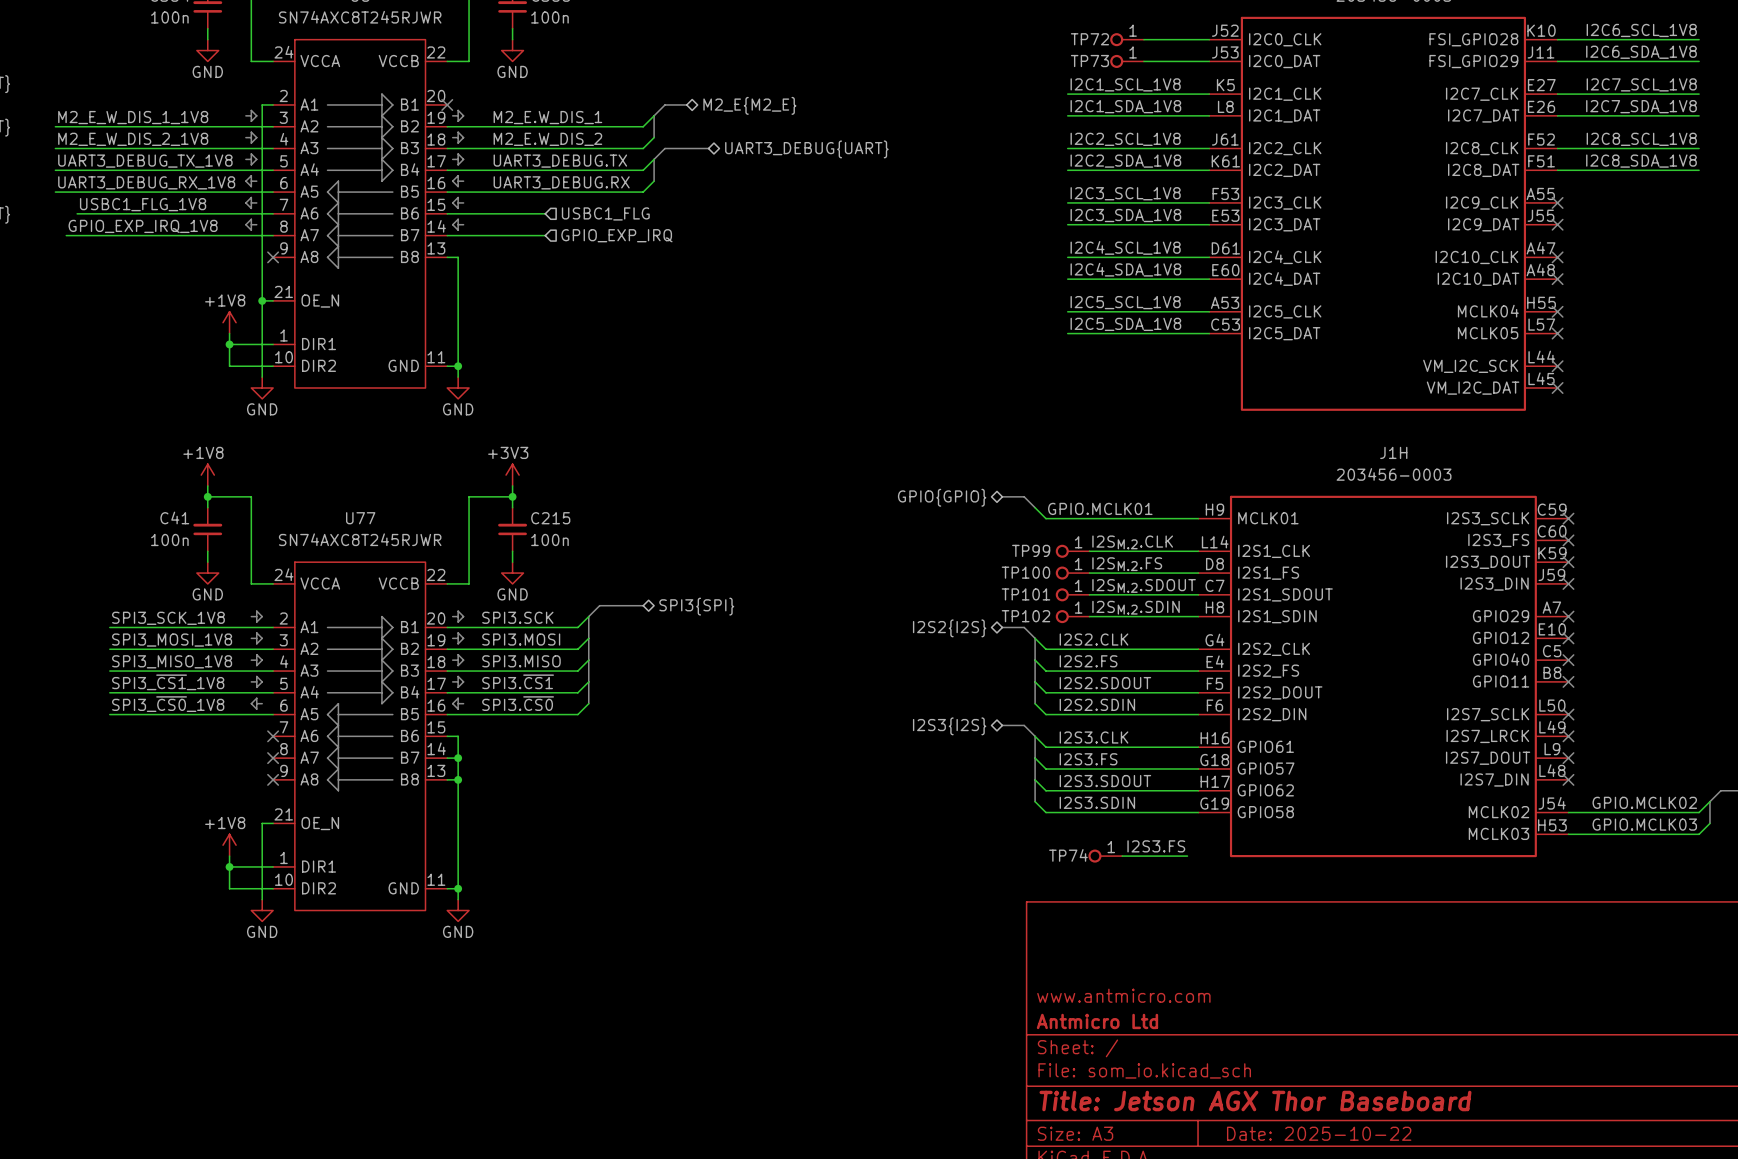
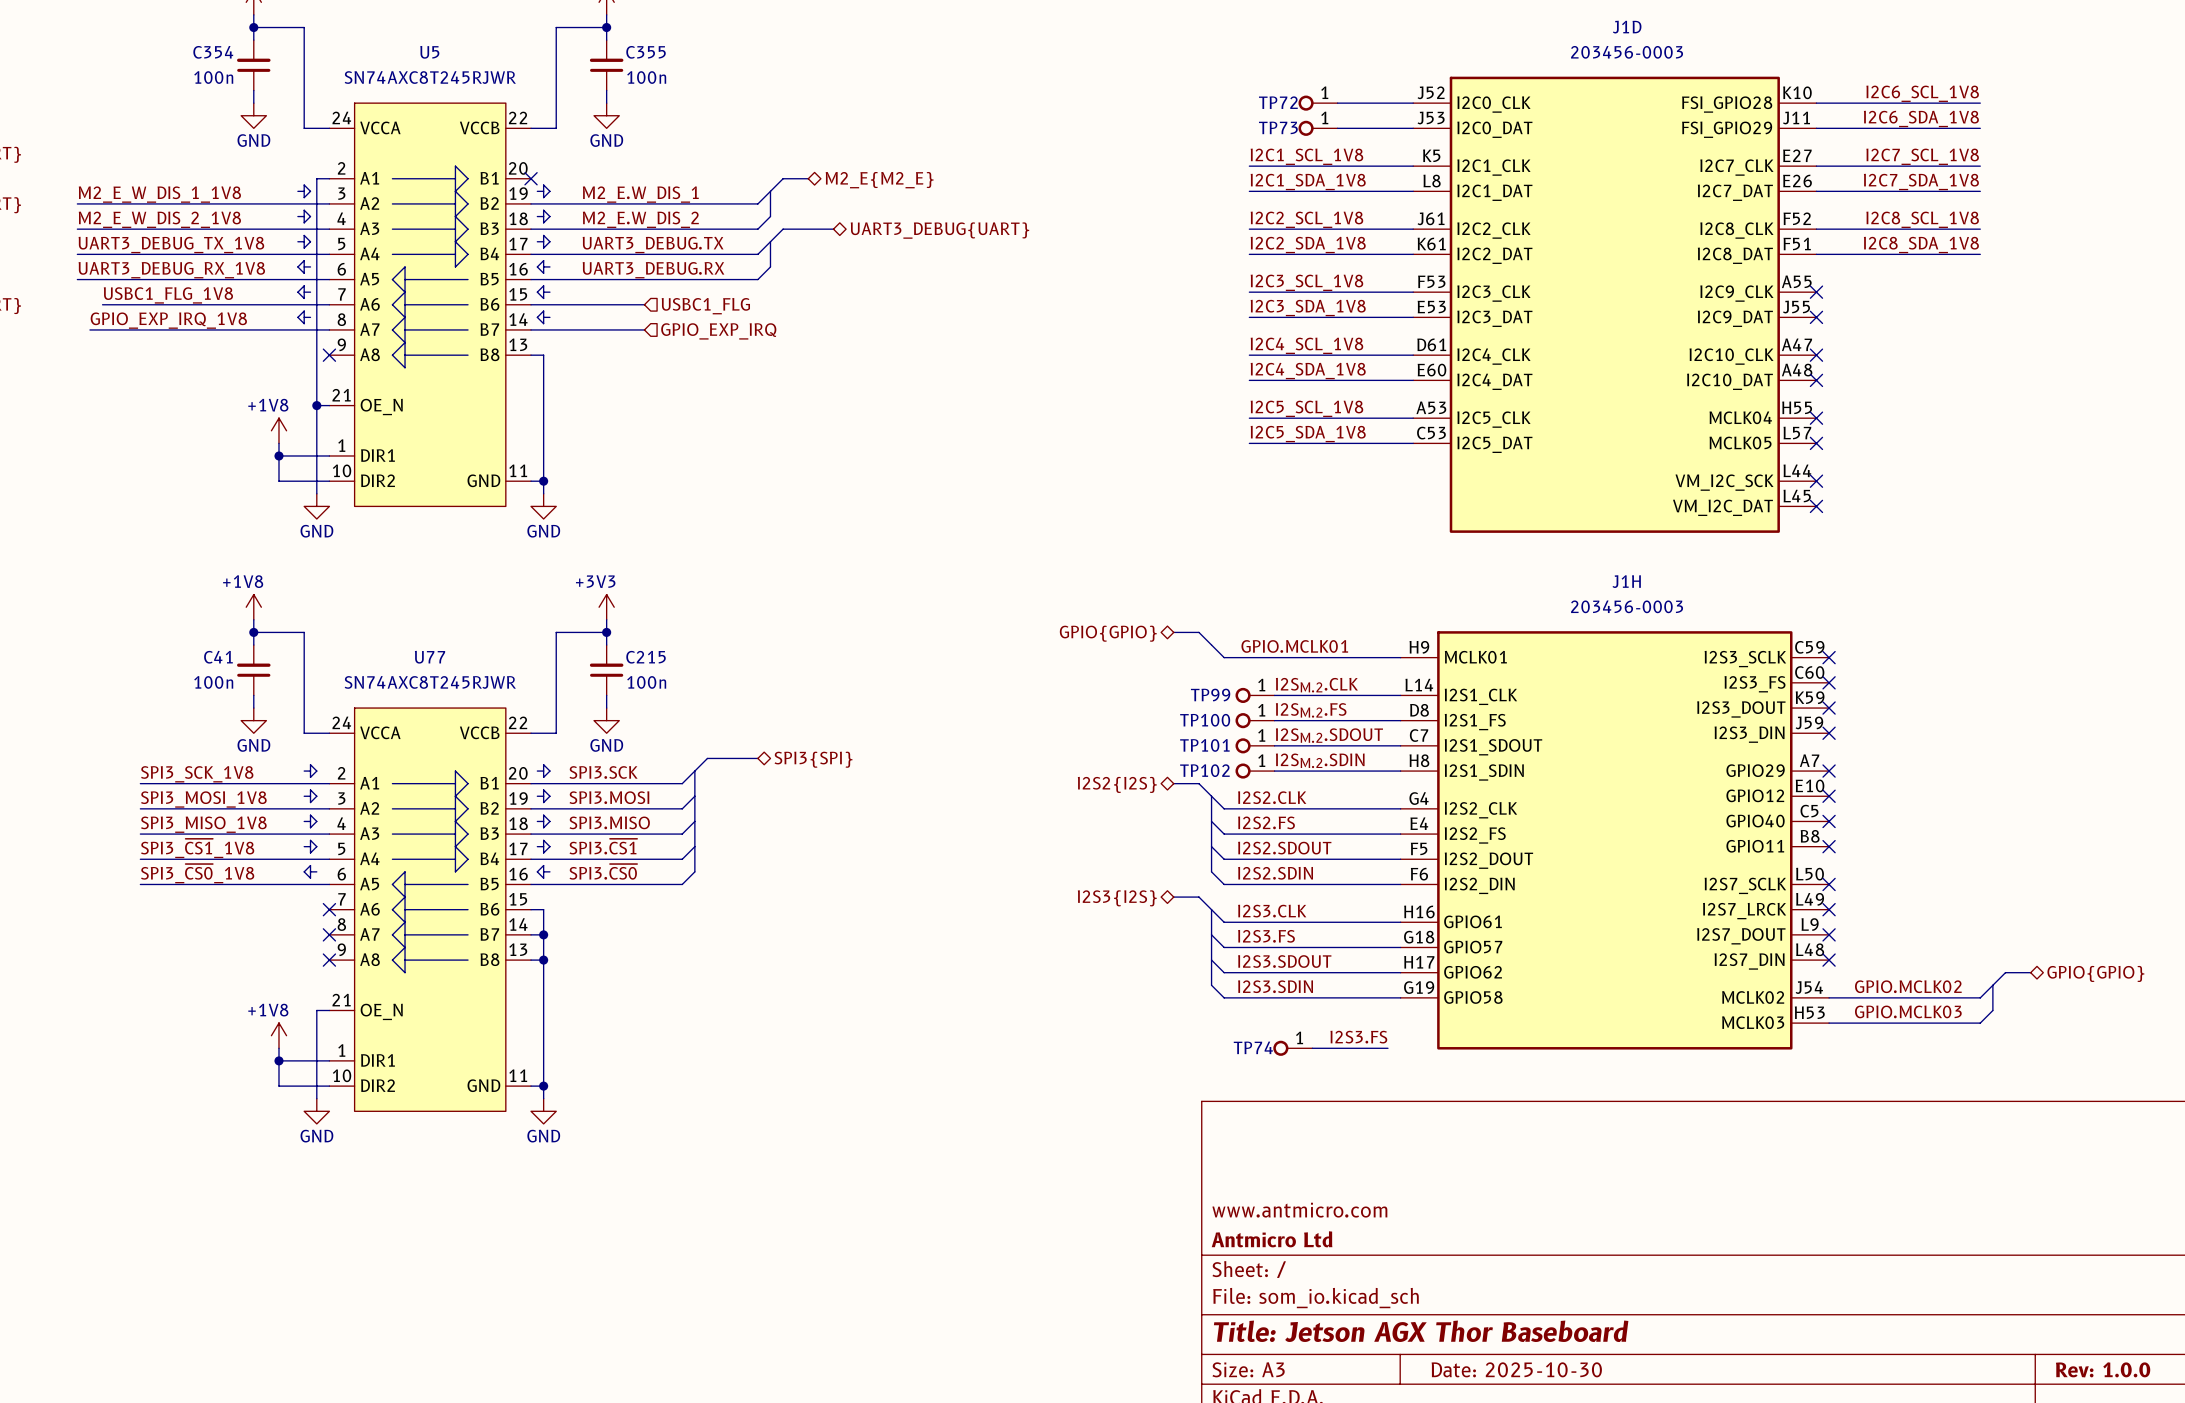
title block: Date: 2025-10-22 (1319, 1133) -> Date: 2025-10-30 (1516, 1369)

